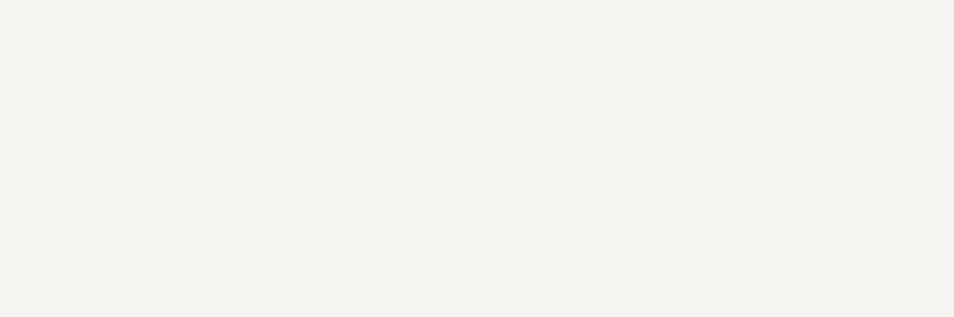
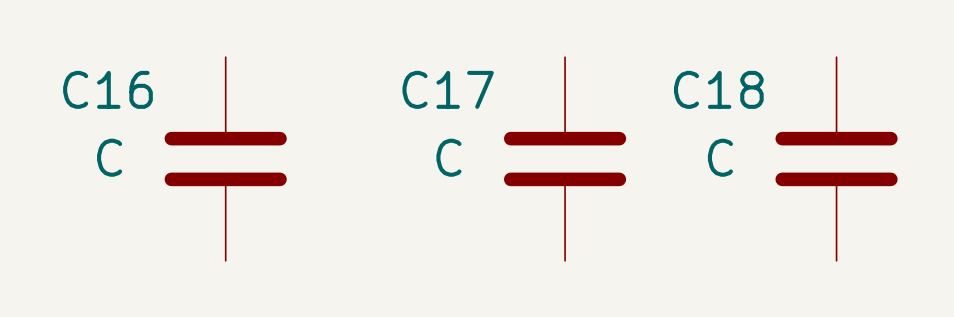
C16: none -> C (225, 159)
C17: none -> C (565, 159)
C18: none -> C (836, 159)

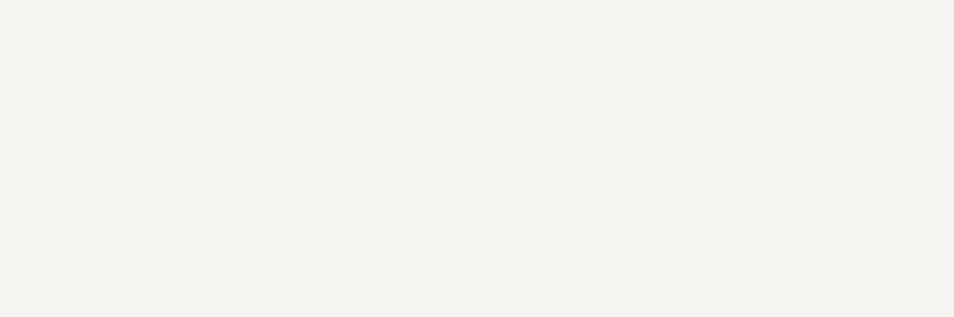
C16: C (225, 159) -> none
C17: C (565, 159) -> none
C18: C (836, 159) -> none

